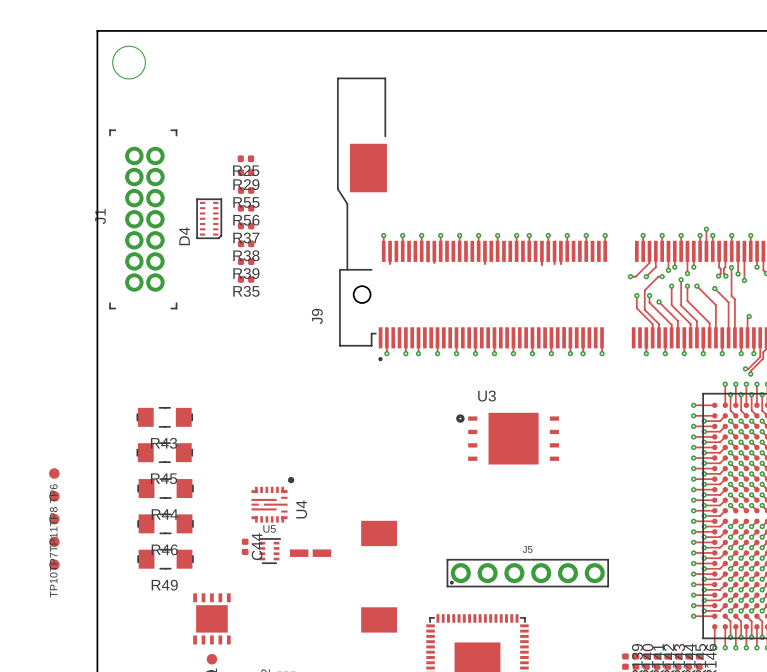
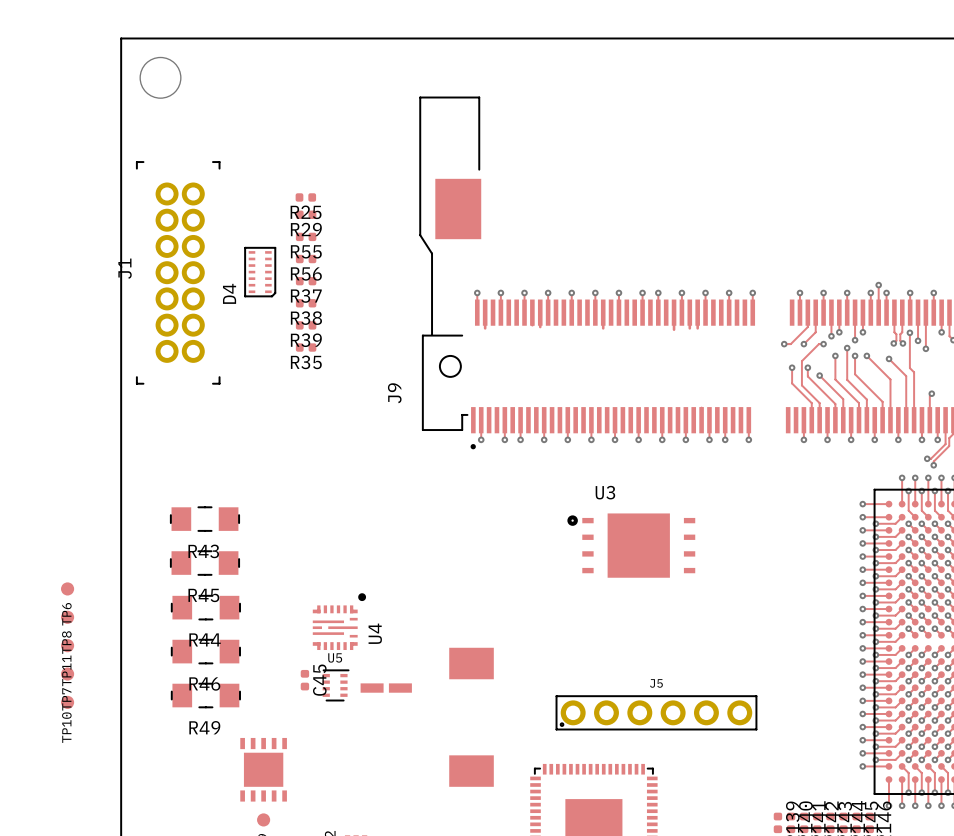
C44 name: C44 (257, 546) -> C45 (319, 680)

